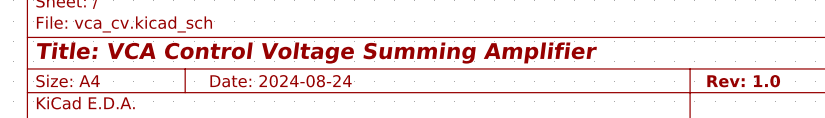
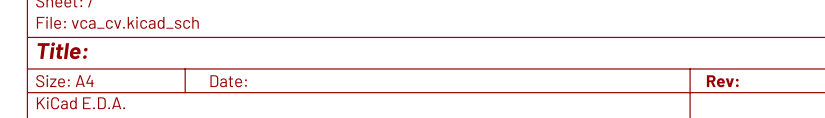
title block: Title: VCA Control Voltage Summing Amplifier (316, 53) -> Title: (62, 50)
title block: Date: 2024-08-24 (281, 81) -> Date: (228, 81)
title block: Rev: 1.0 (743, 81) -> Rev: (722, 81)

